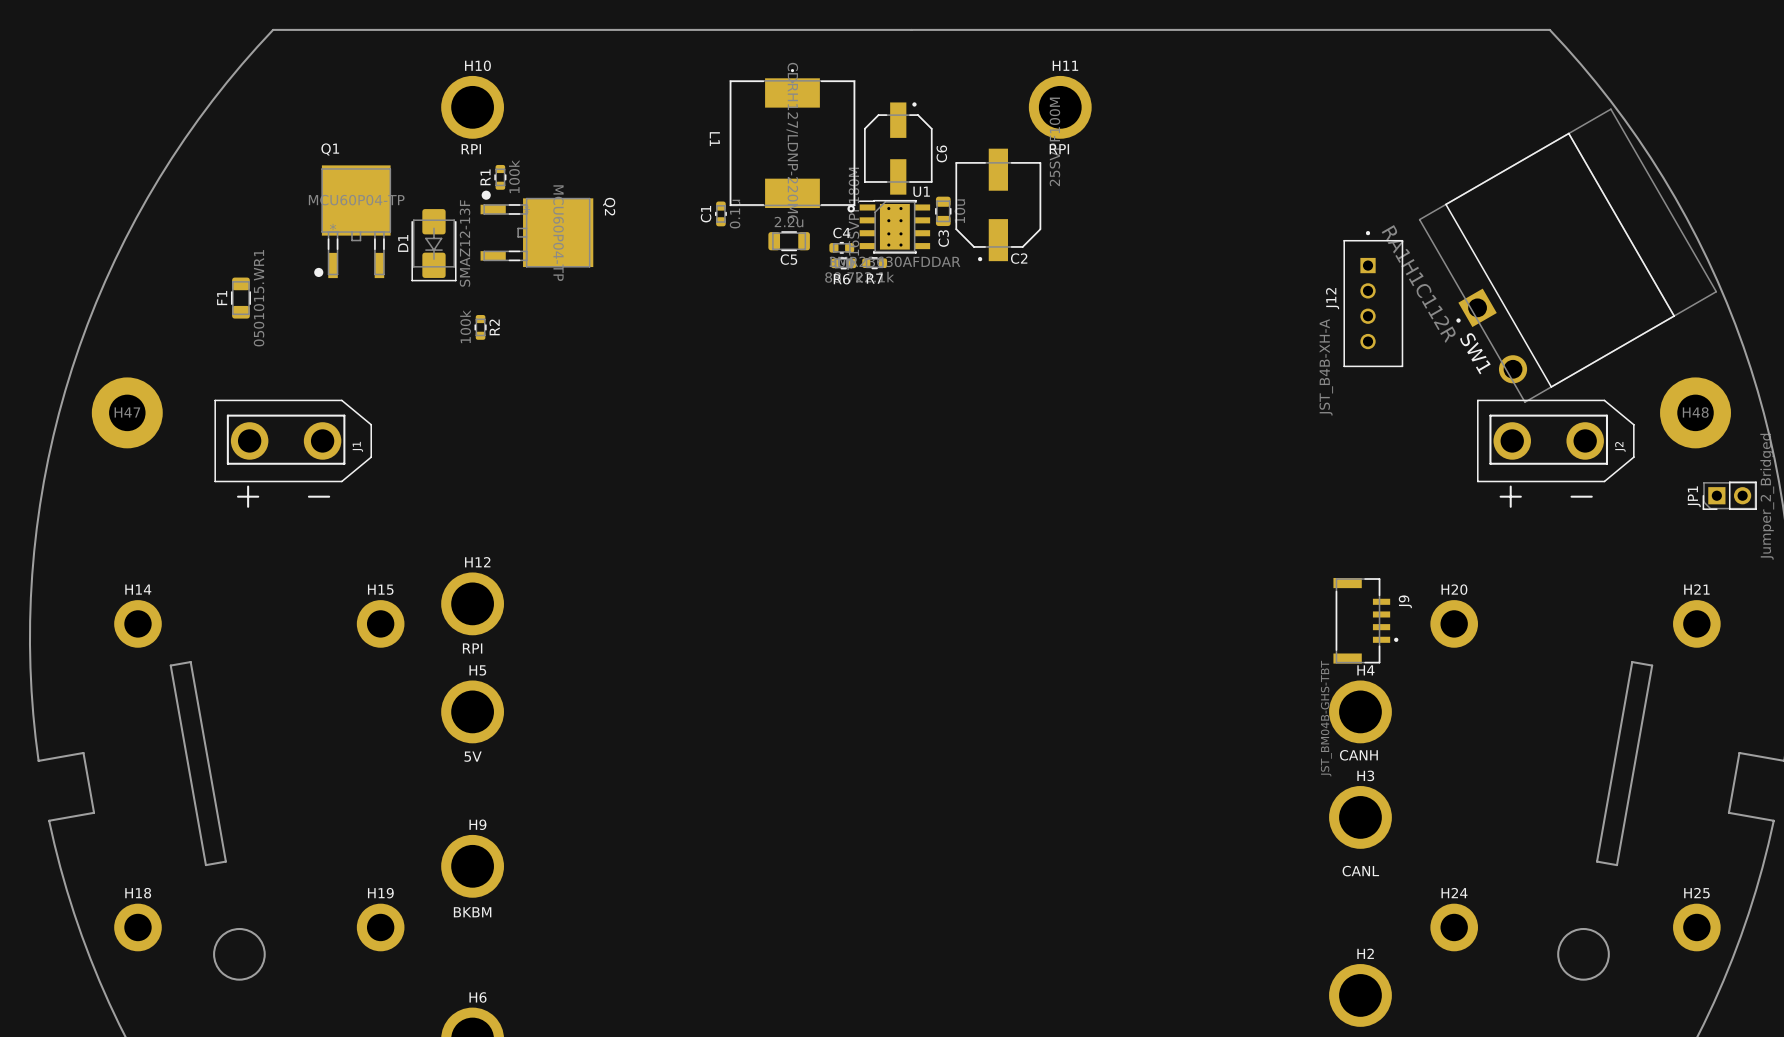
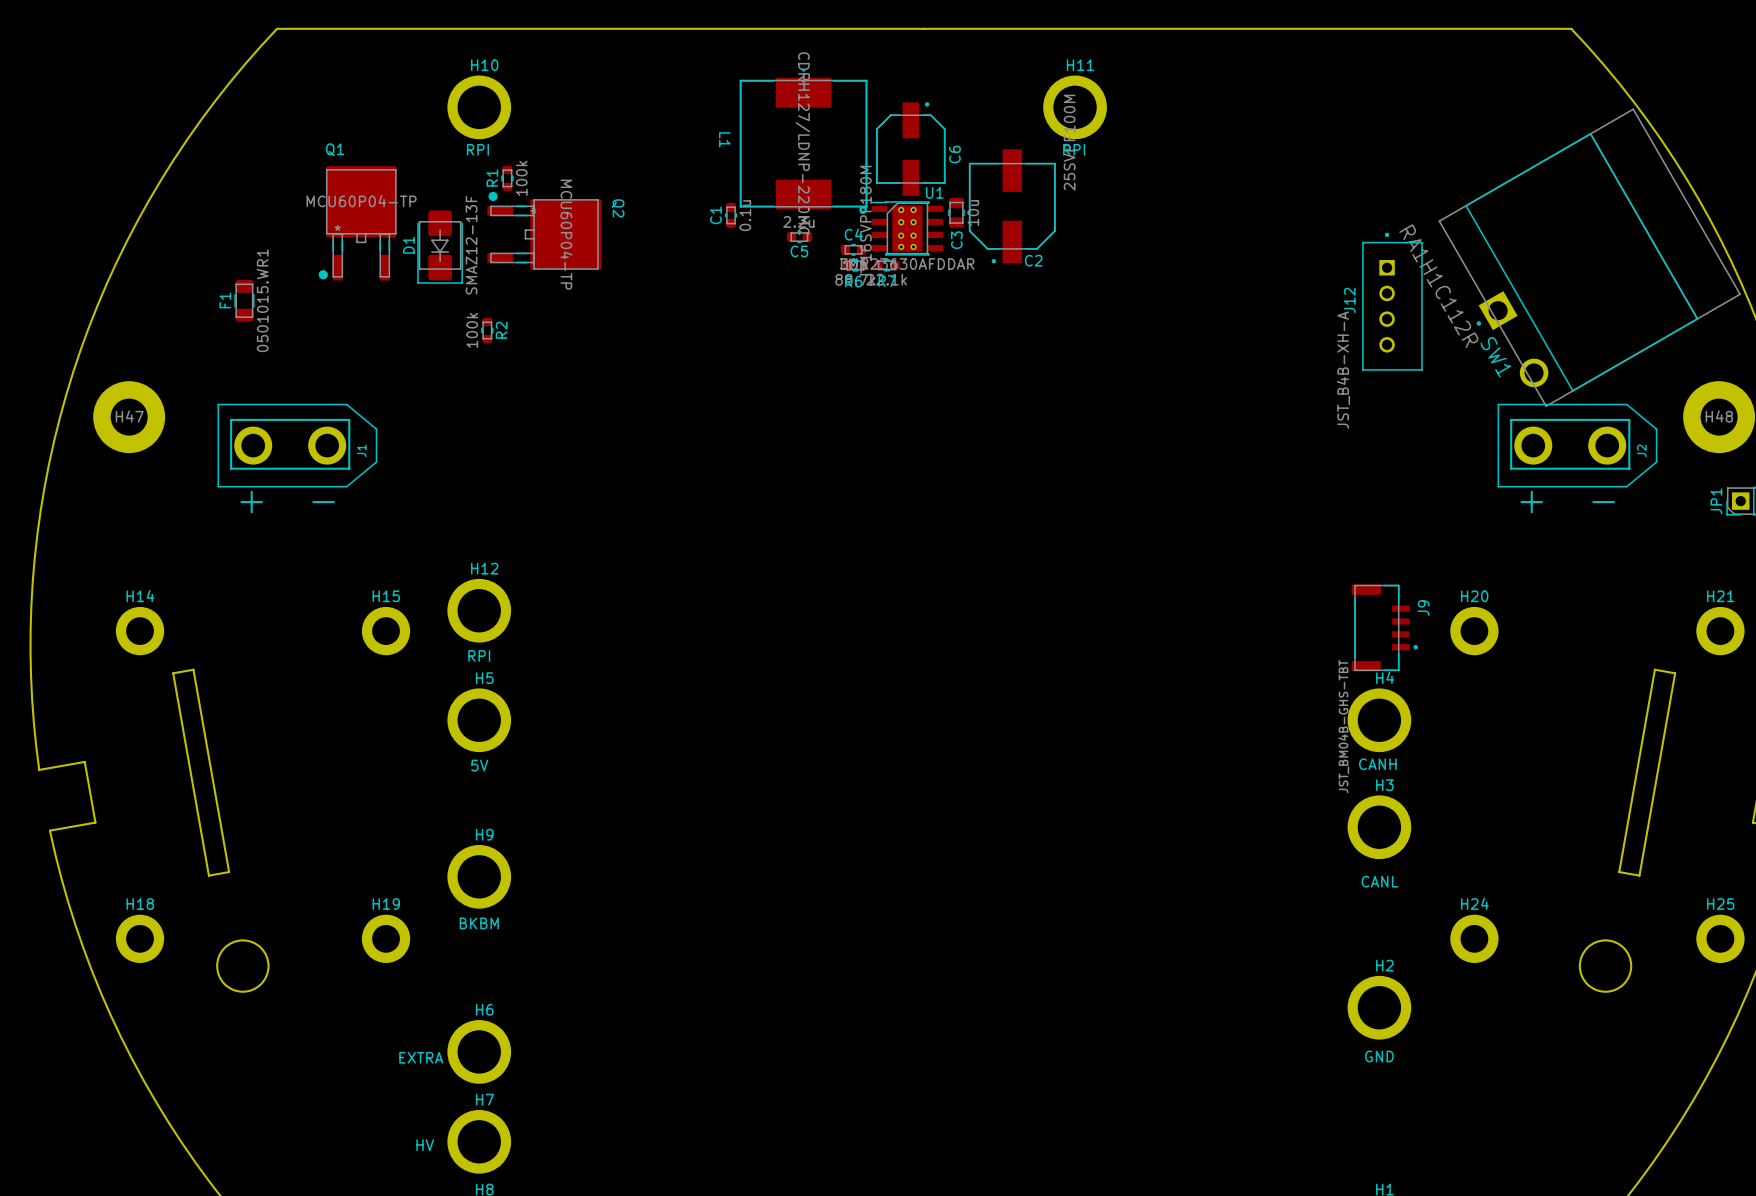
C5 footprint: [768, 231, 810, 252] -> [786, 231, 812, 243]

